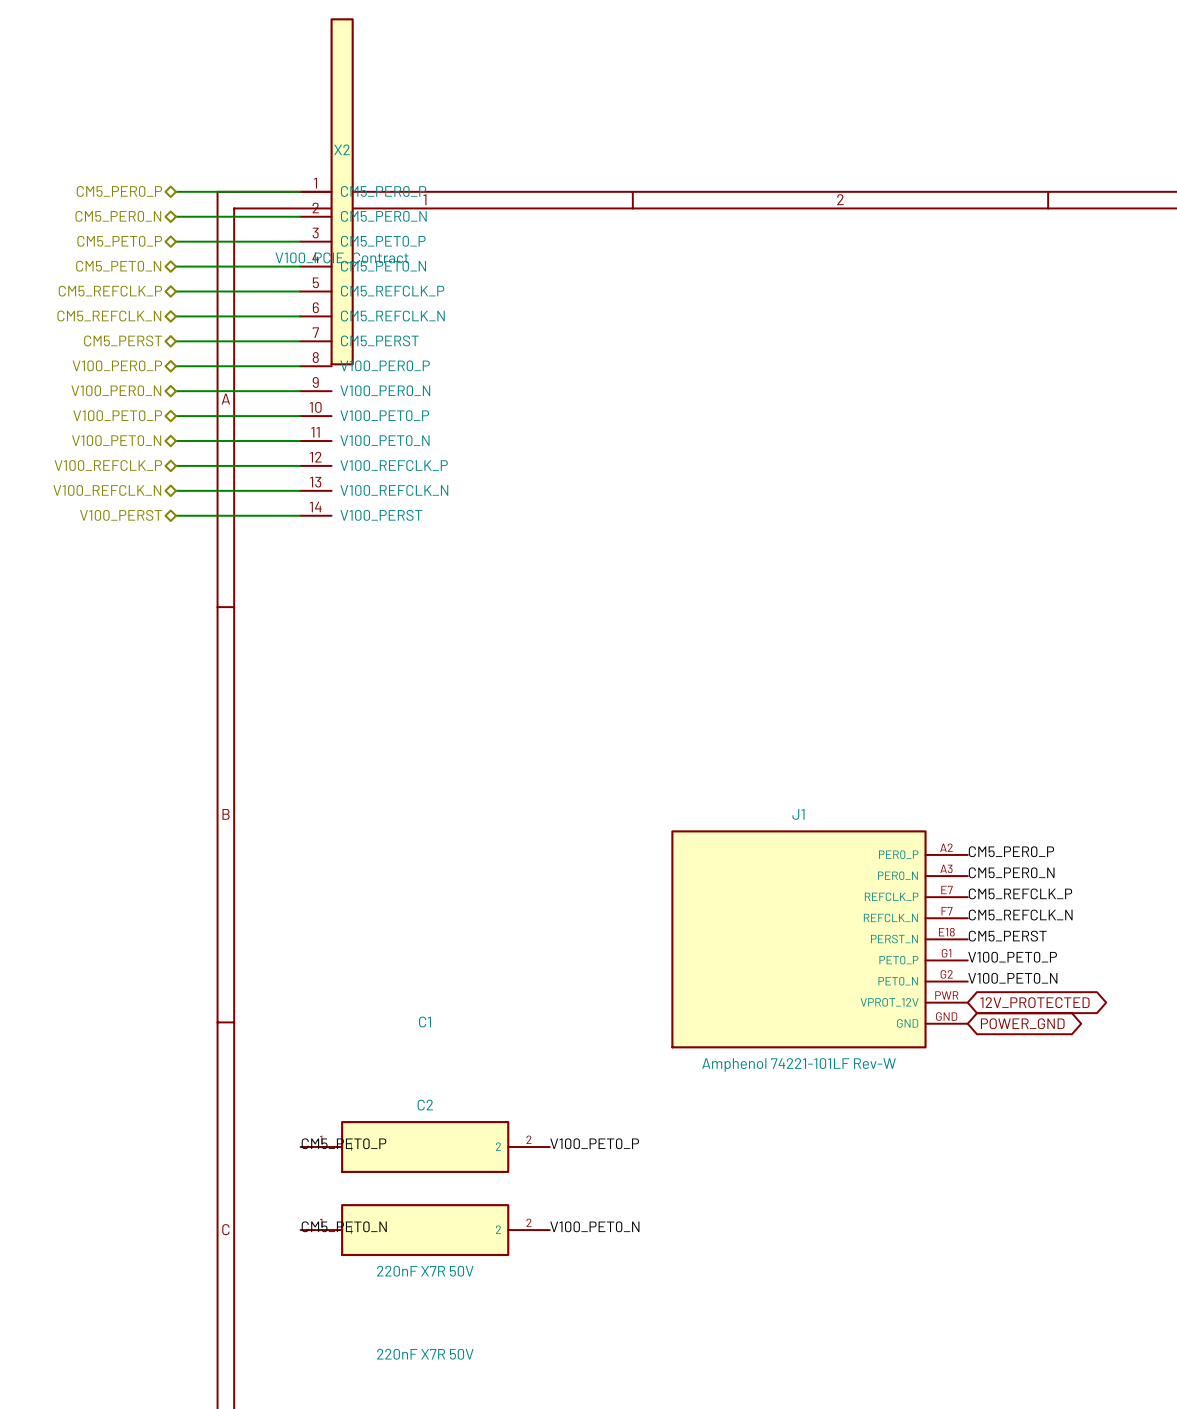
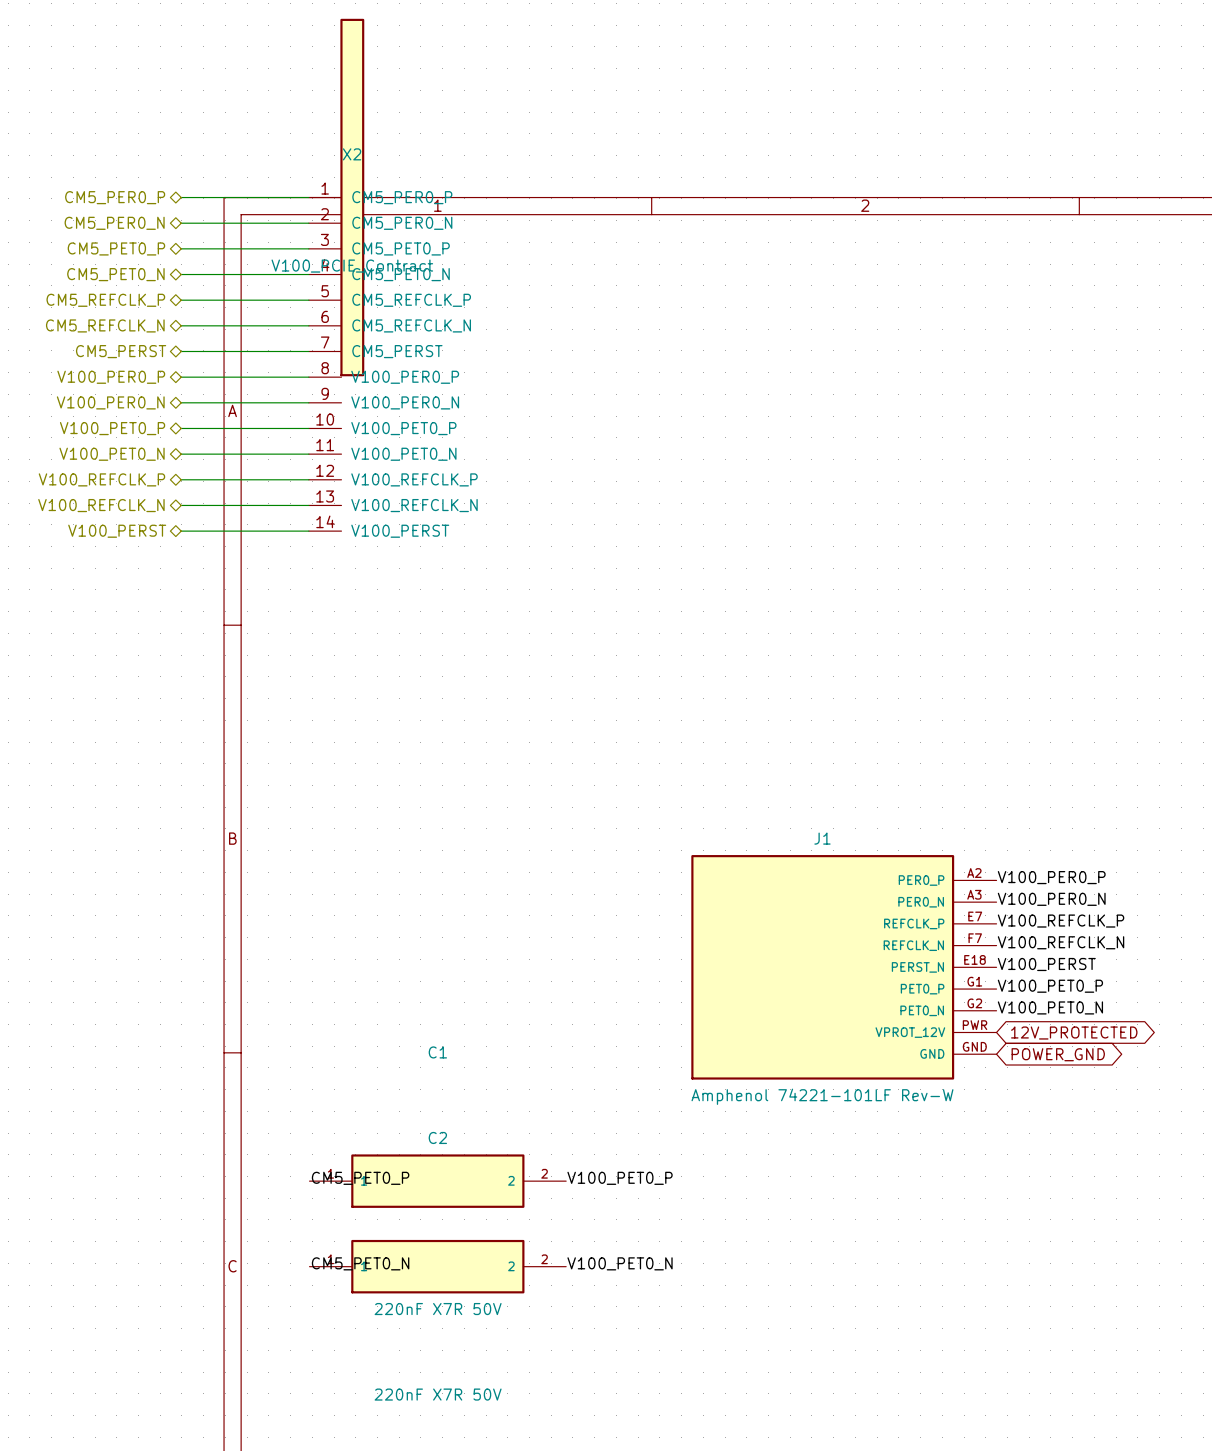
label: CM5_PER0_P (1011, 851) -> V100_PER0_P (1051, 877)
label: CM5_PER0_N (1011, 872) -> V100_PER0_N (1051, 899)
label: CM5_REFCLK_P (1020, 893) -> V100_REFCLK_P (1061, 921)
label: CM5_REFCLK_N (1020, 915) -> V100_REFCLK_N (1061, 942)
label: CM5_PERST (1007, 936) -> V100_PERST (1046, 964)

